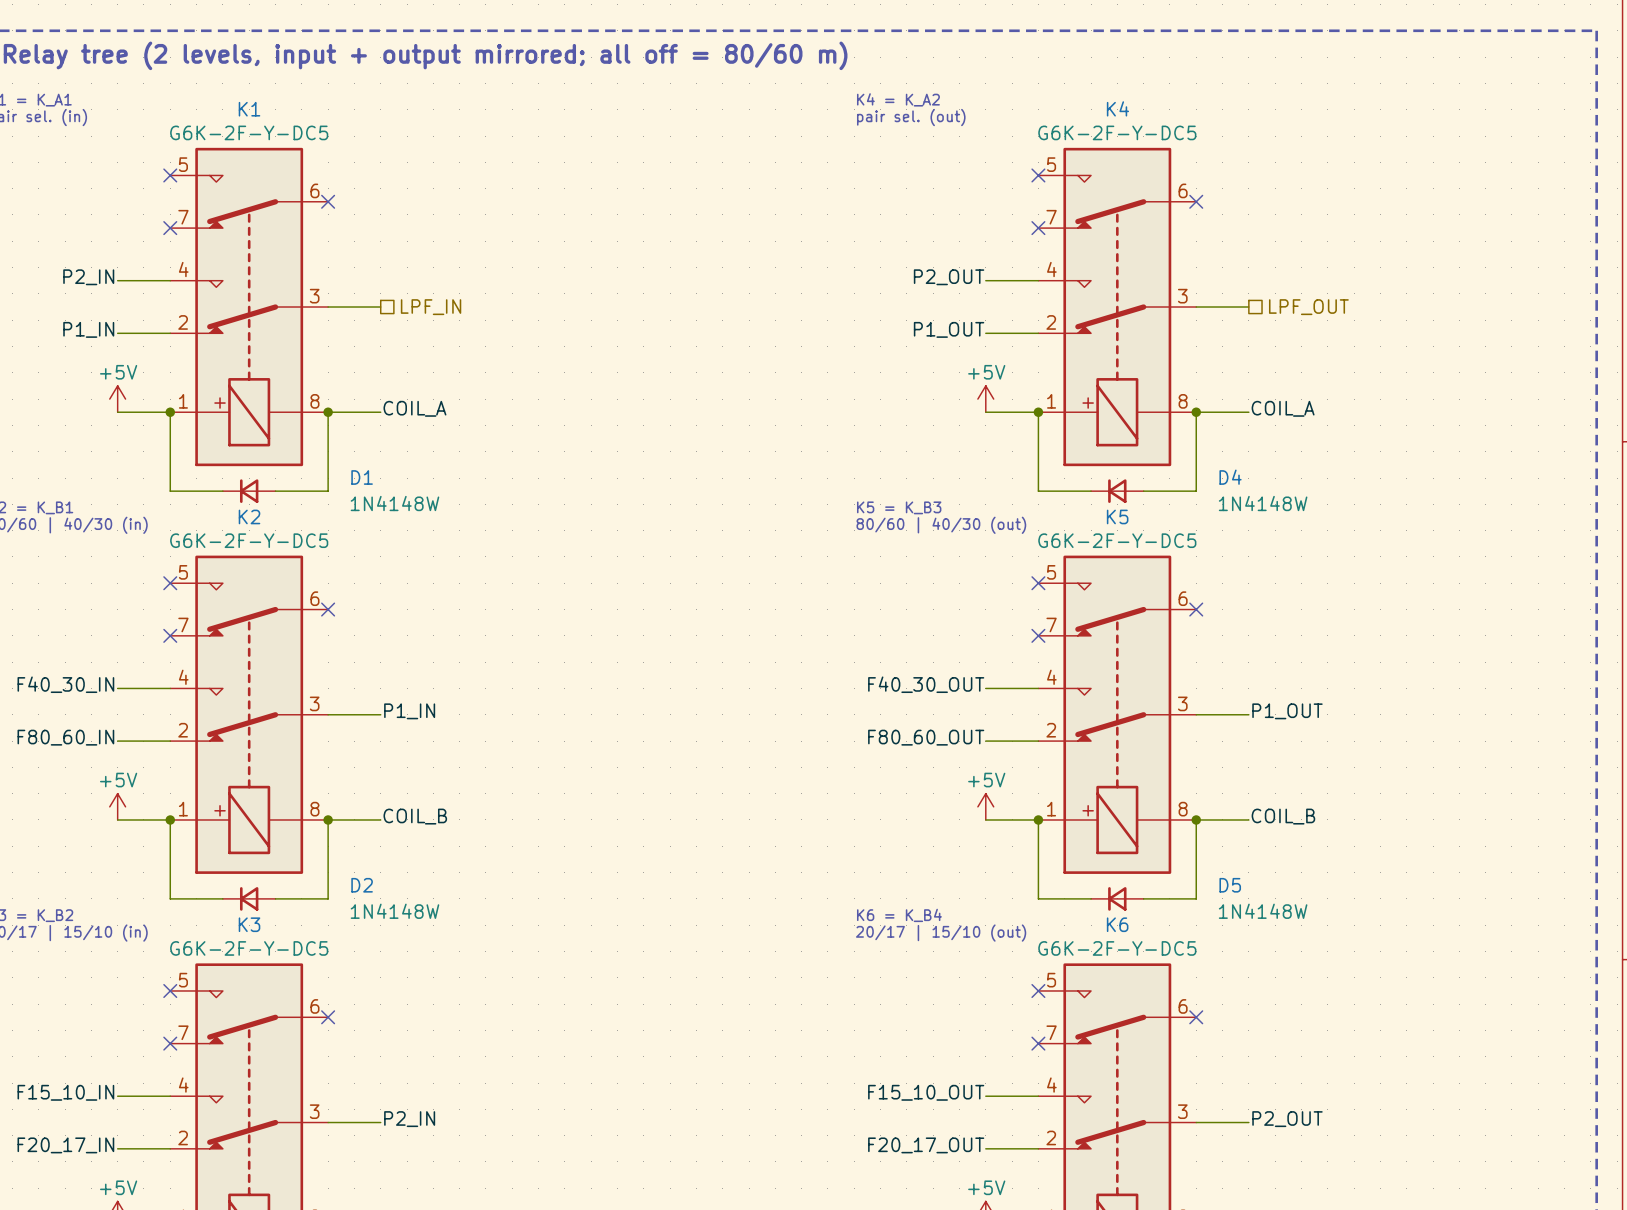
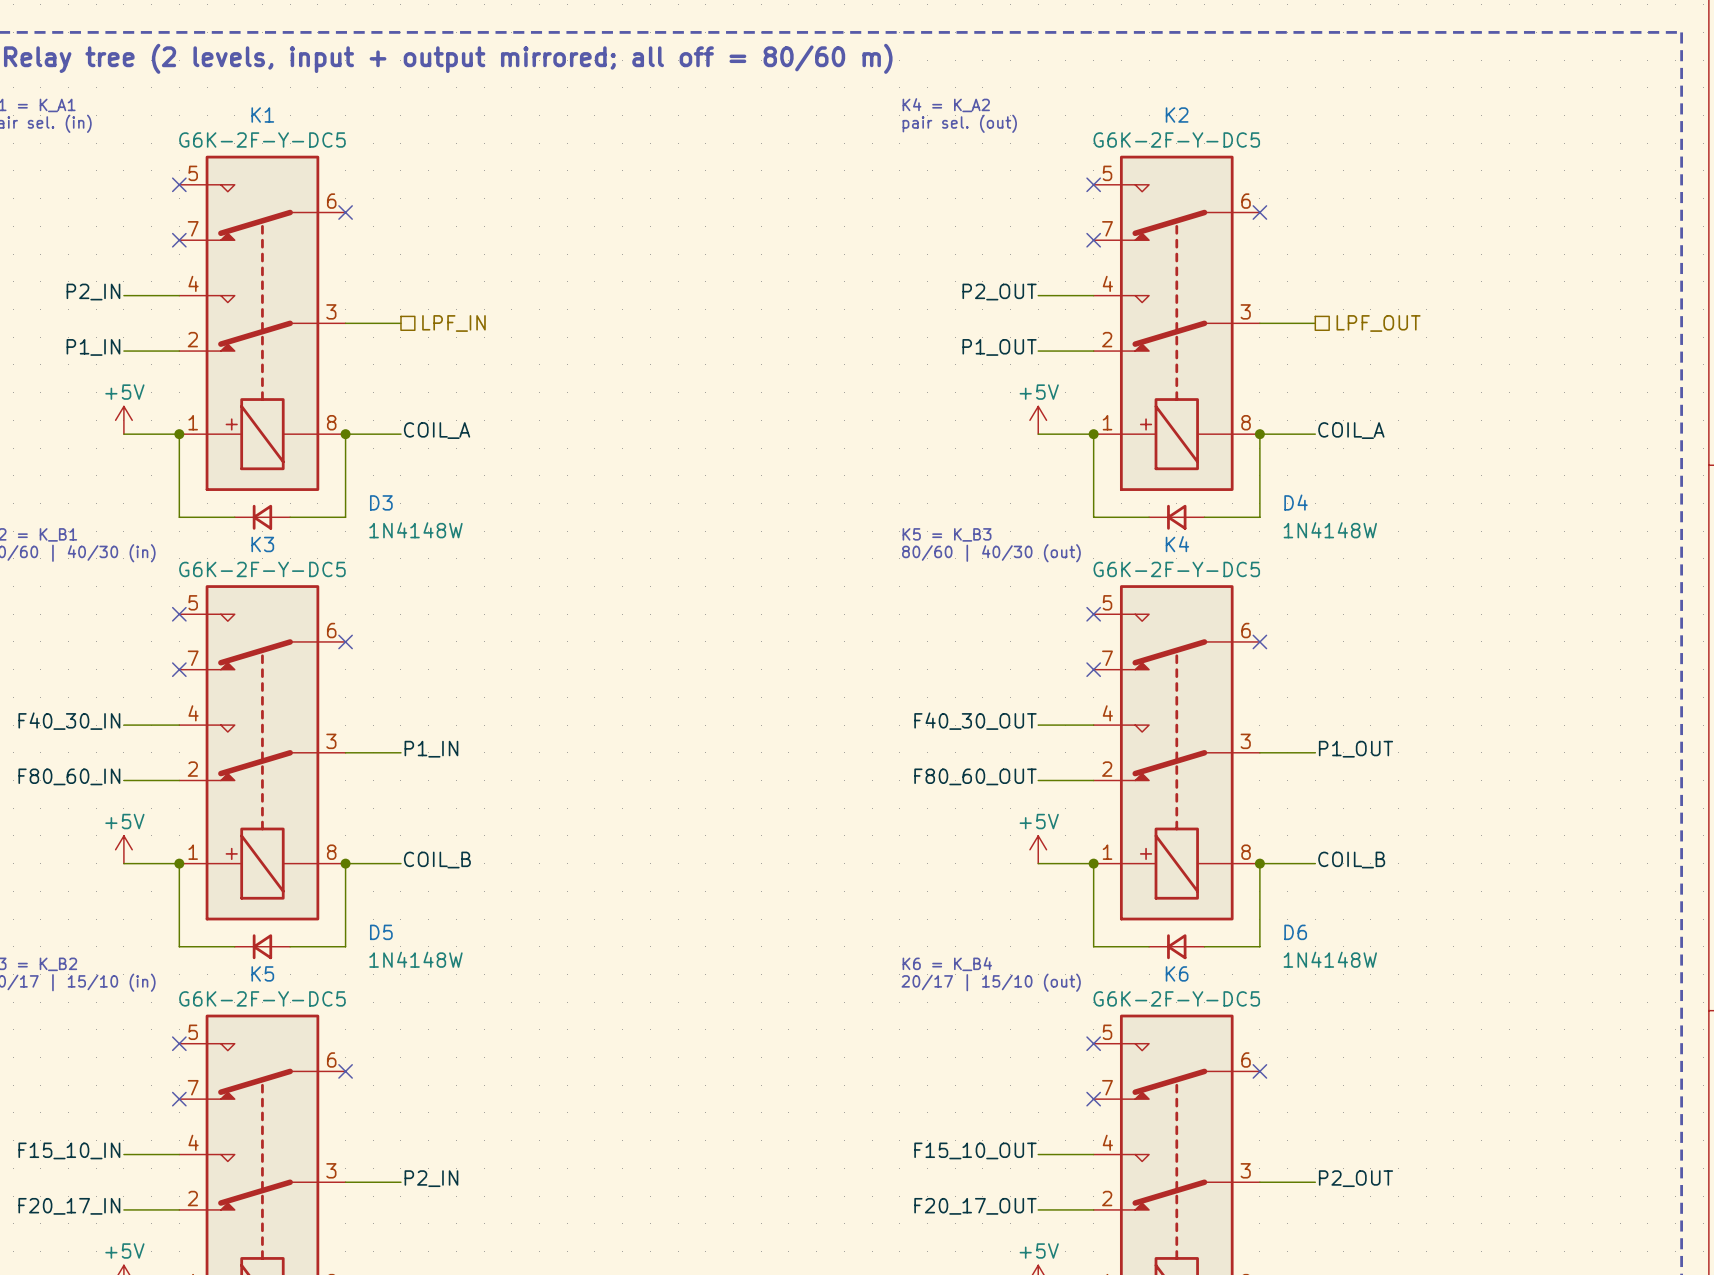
K4 name: K4 (1117, 108) -> K2 (1177, 115)
D1 name: D1 (362, 477) -> D3 (381, 502)
K2 name: K2 (249, 516) -> K3 (262, 544)
K5 name: K5 (1117, 516) -> K4 (1177, 544)
D2 name: D2 (362, 885) -> D5 (381, 932)
D5 name: D5 (1230, 885) -> D6 (1295, 932)
K3 name: K3 (249, 924) -> K5 (262, 973)

